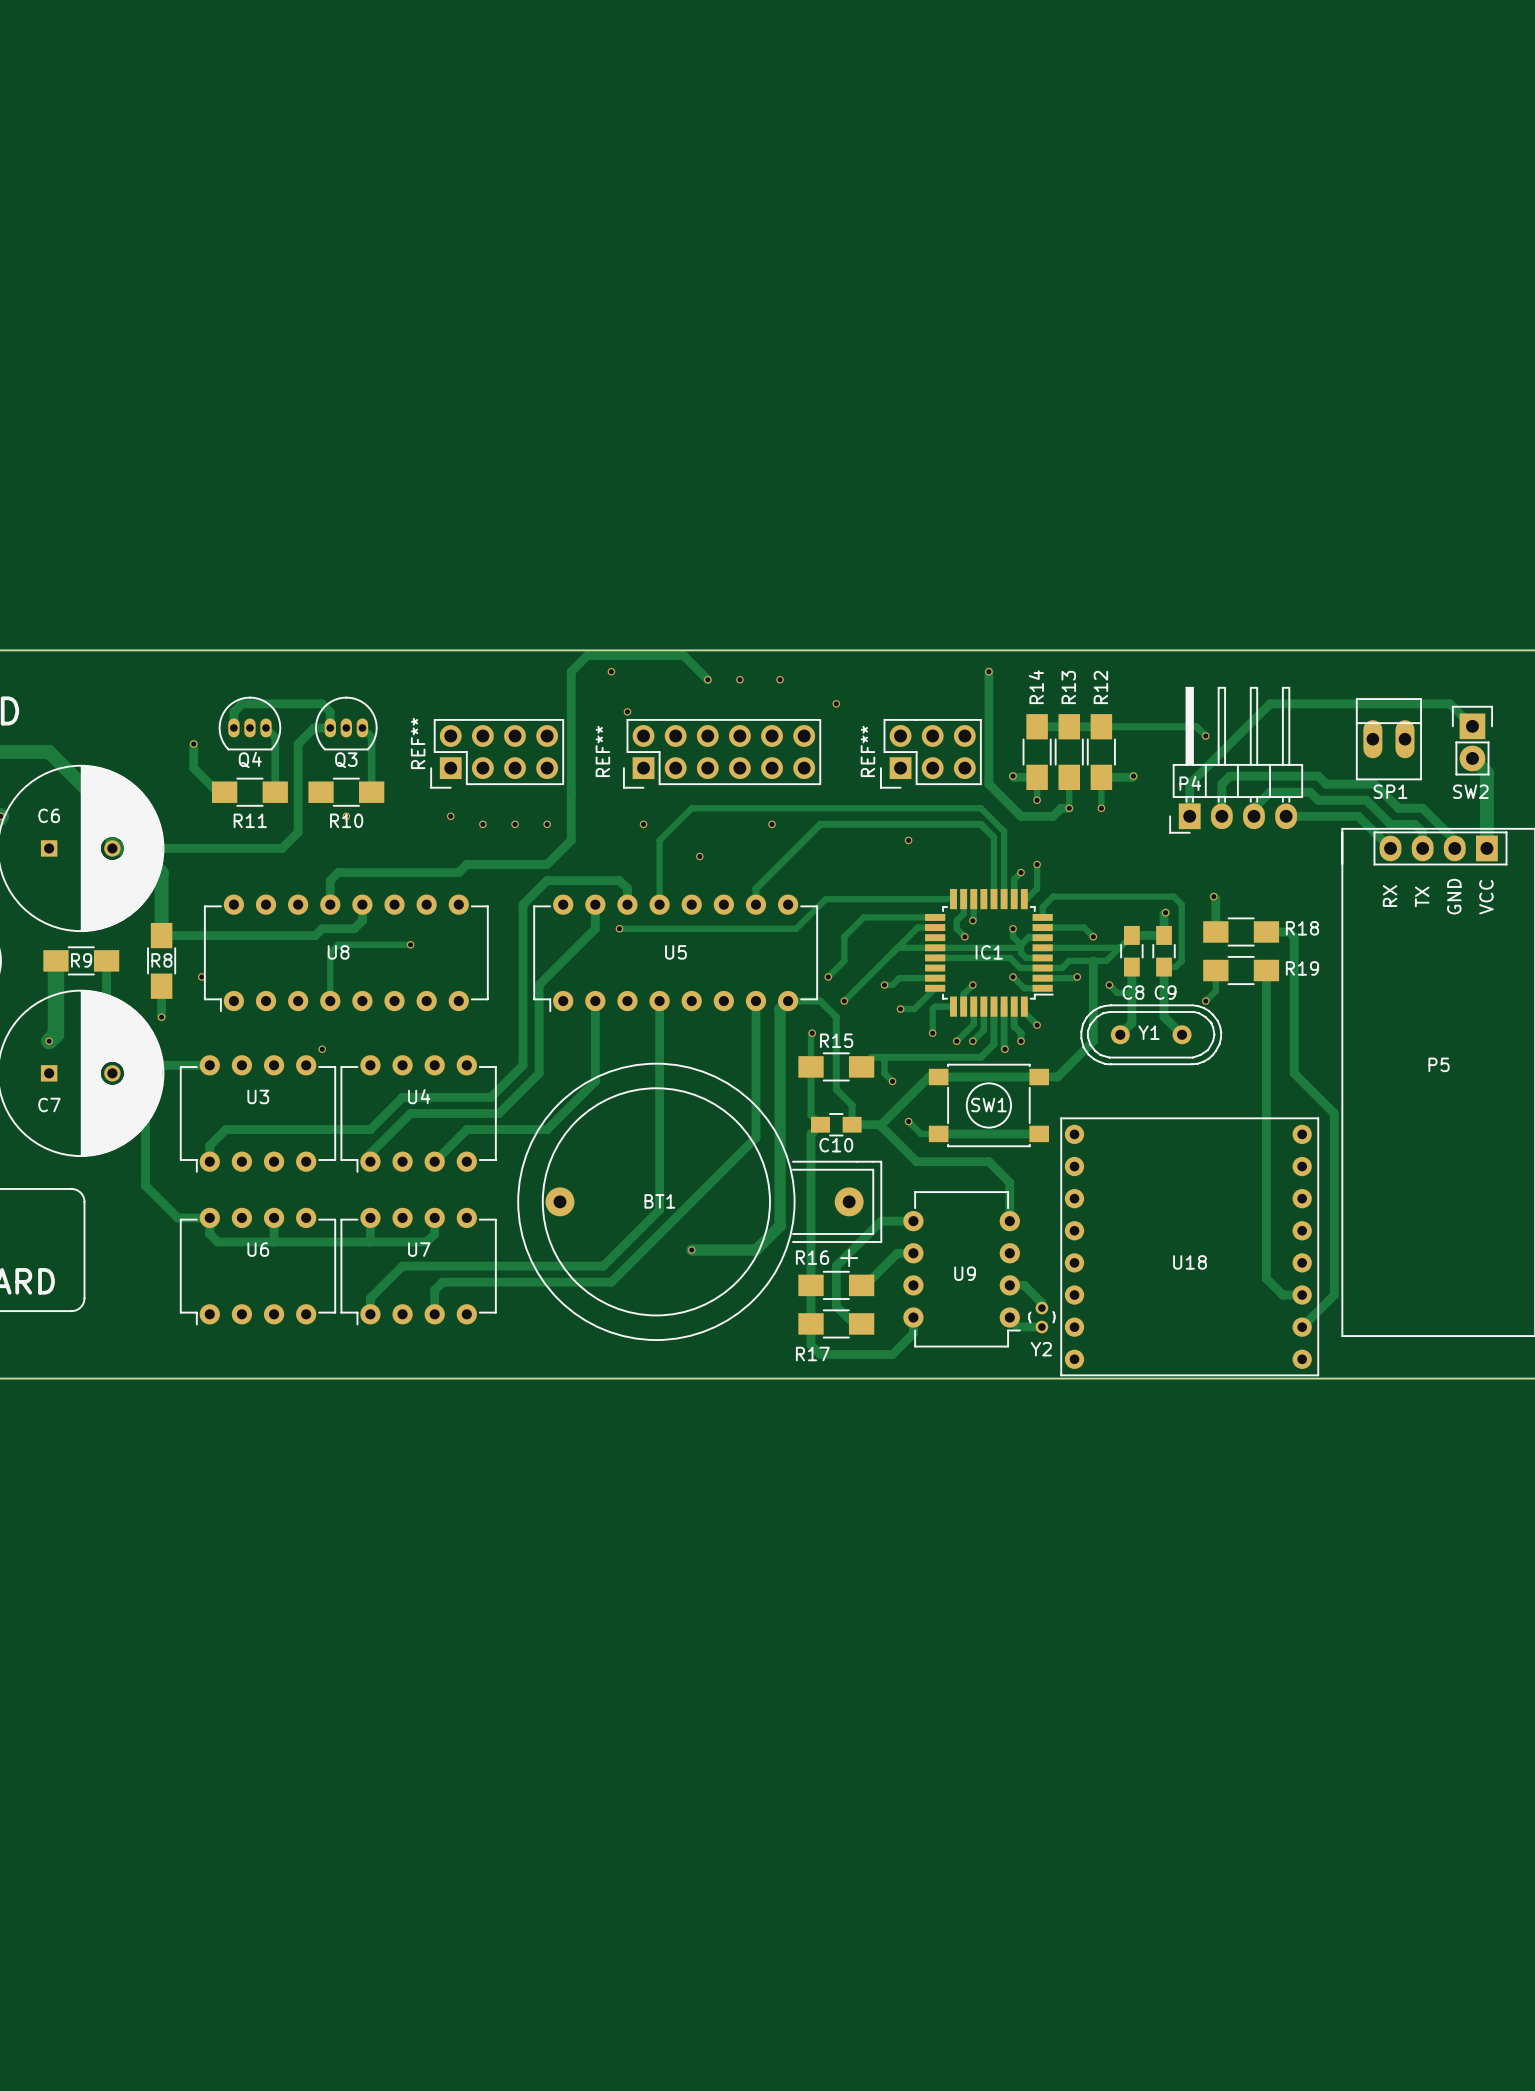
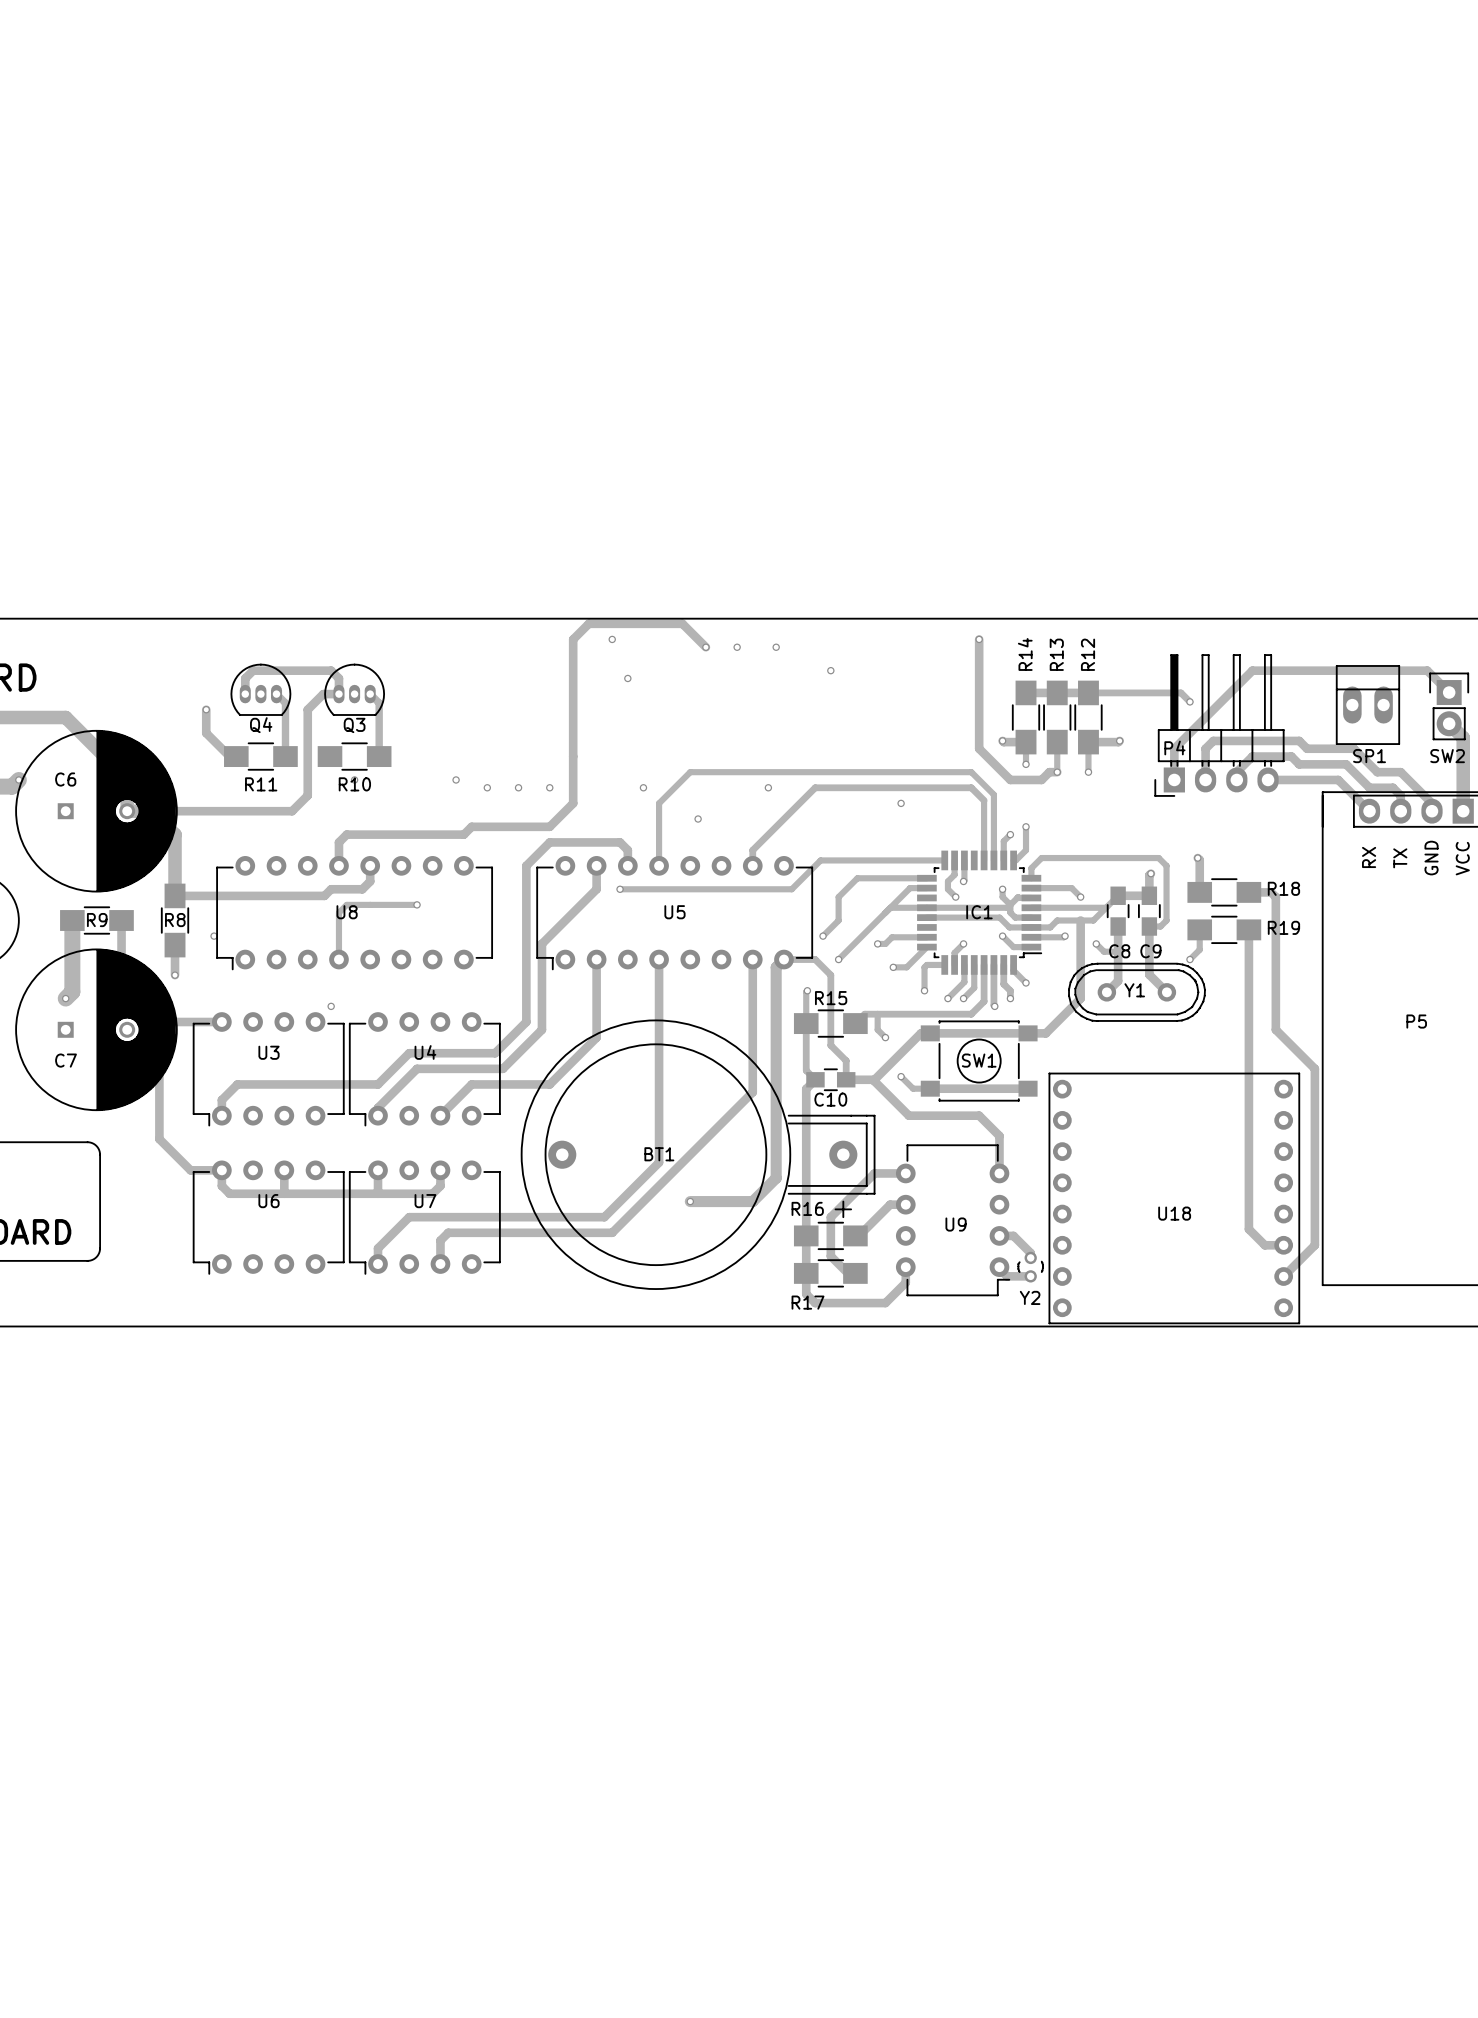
REF**: (497, 753) -> none
REF**: (722, 753) -> none
REF**: (930, 753) -> none

